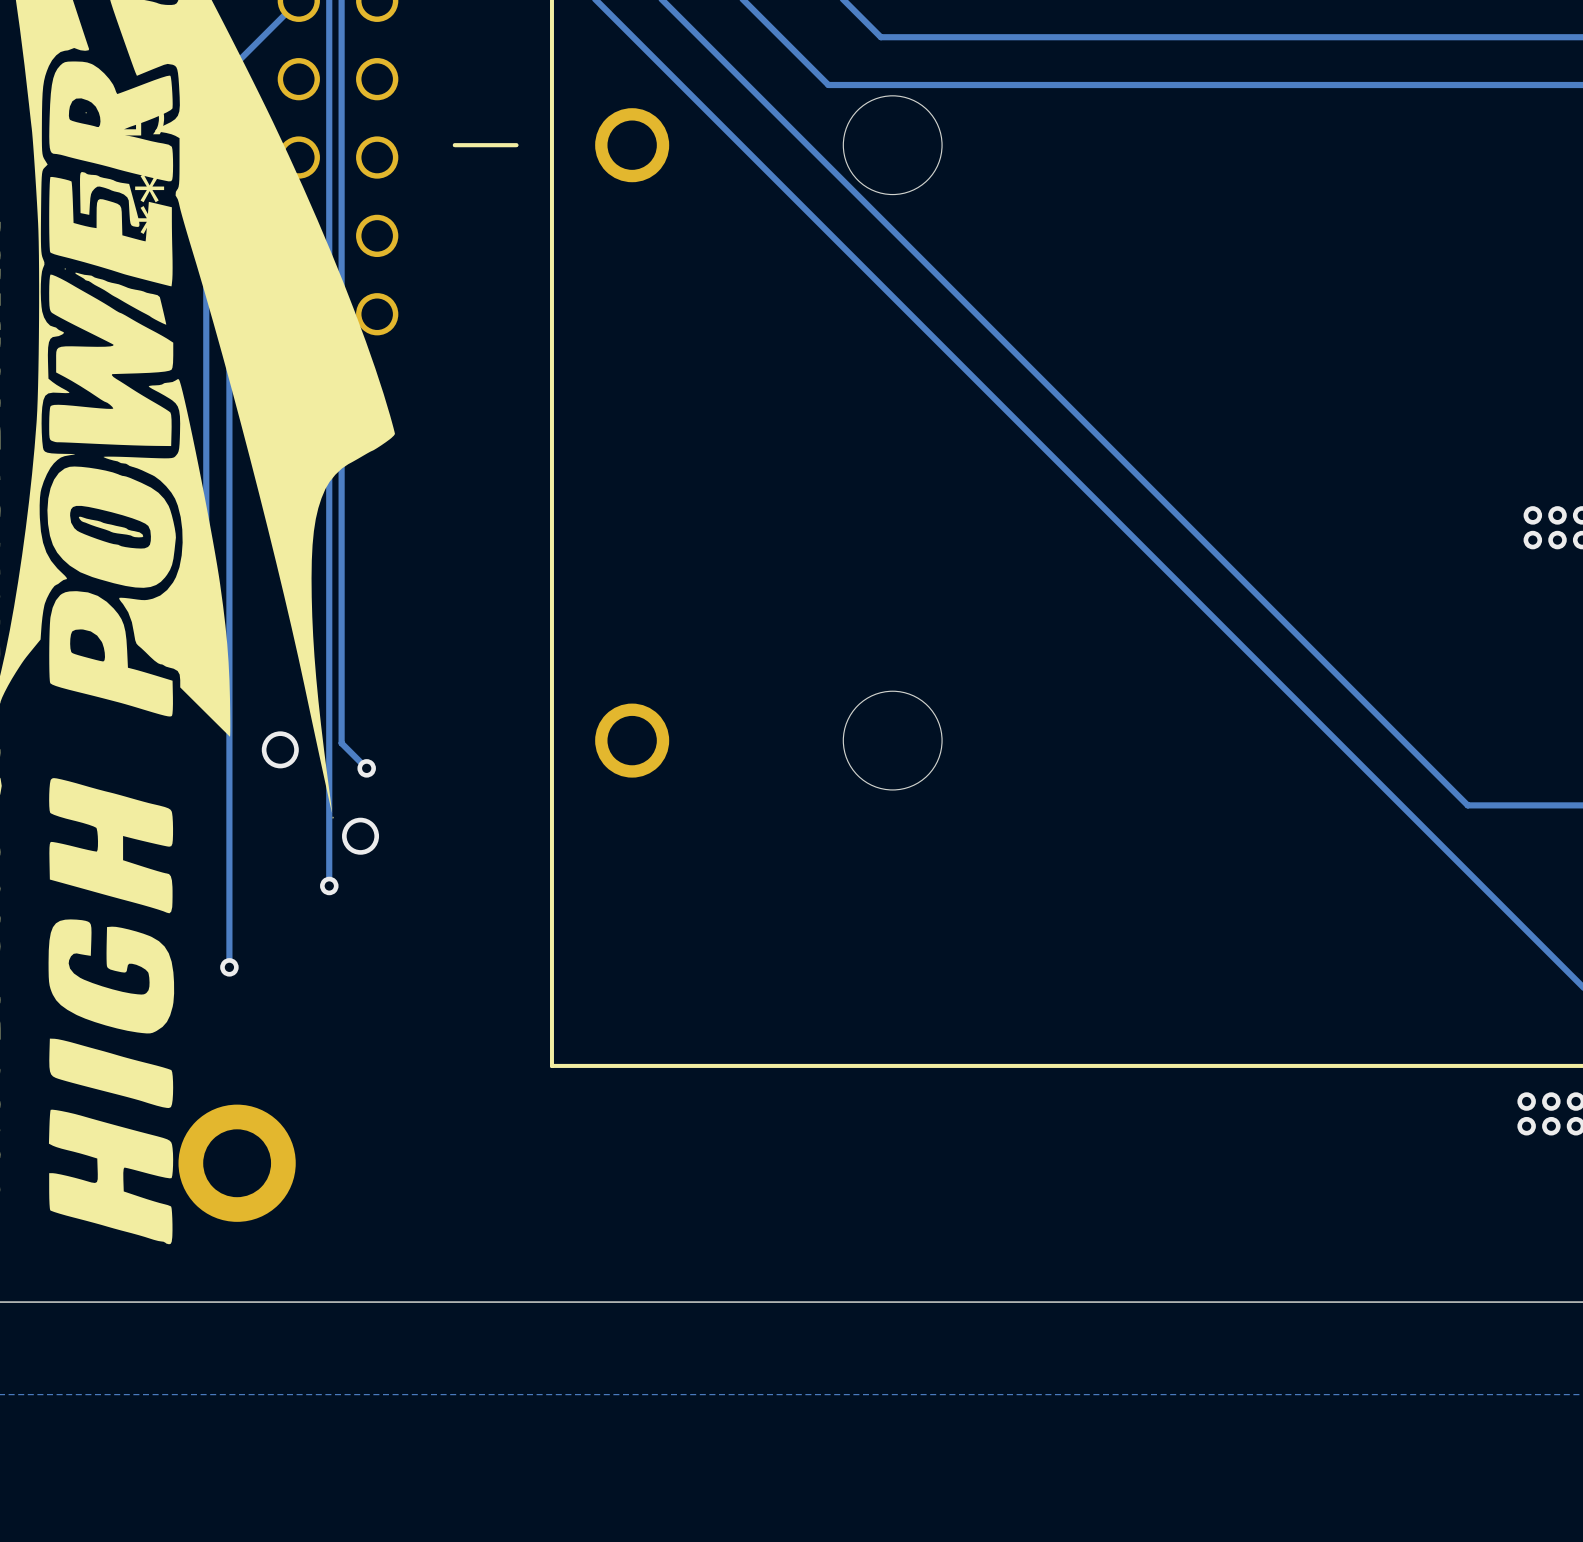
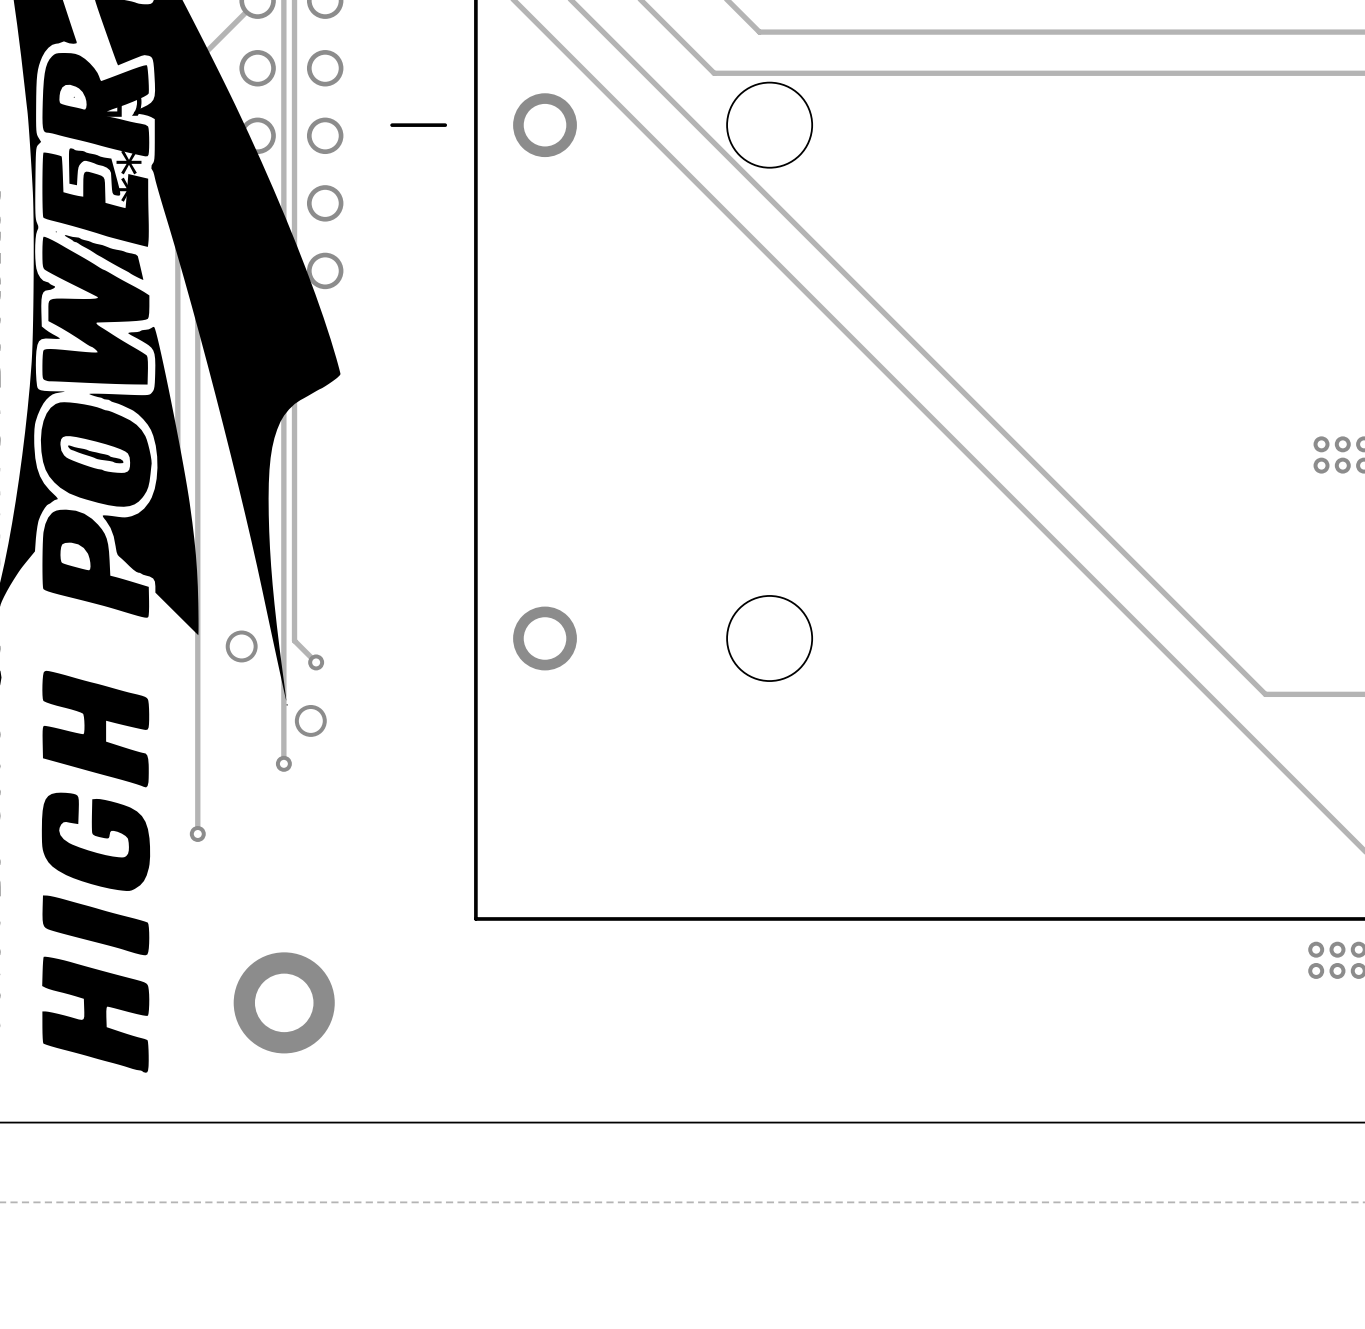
part position: (237, 1163) -> (284, 1002)

